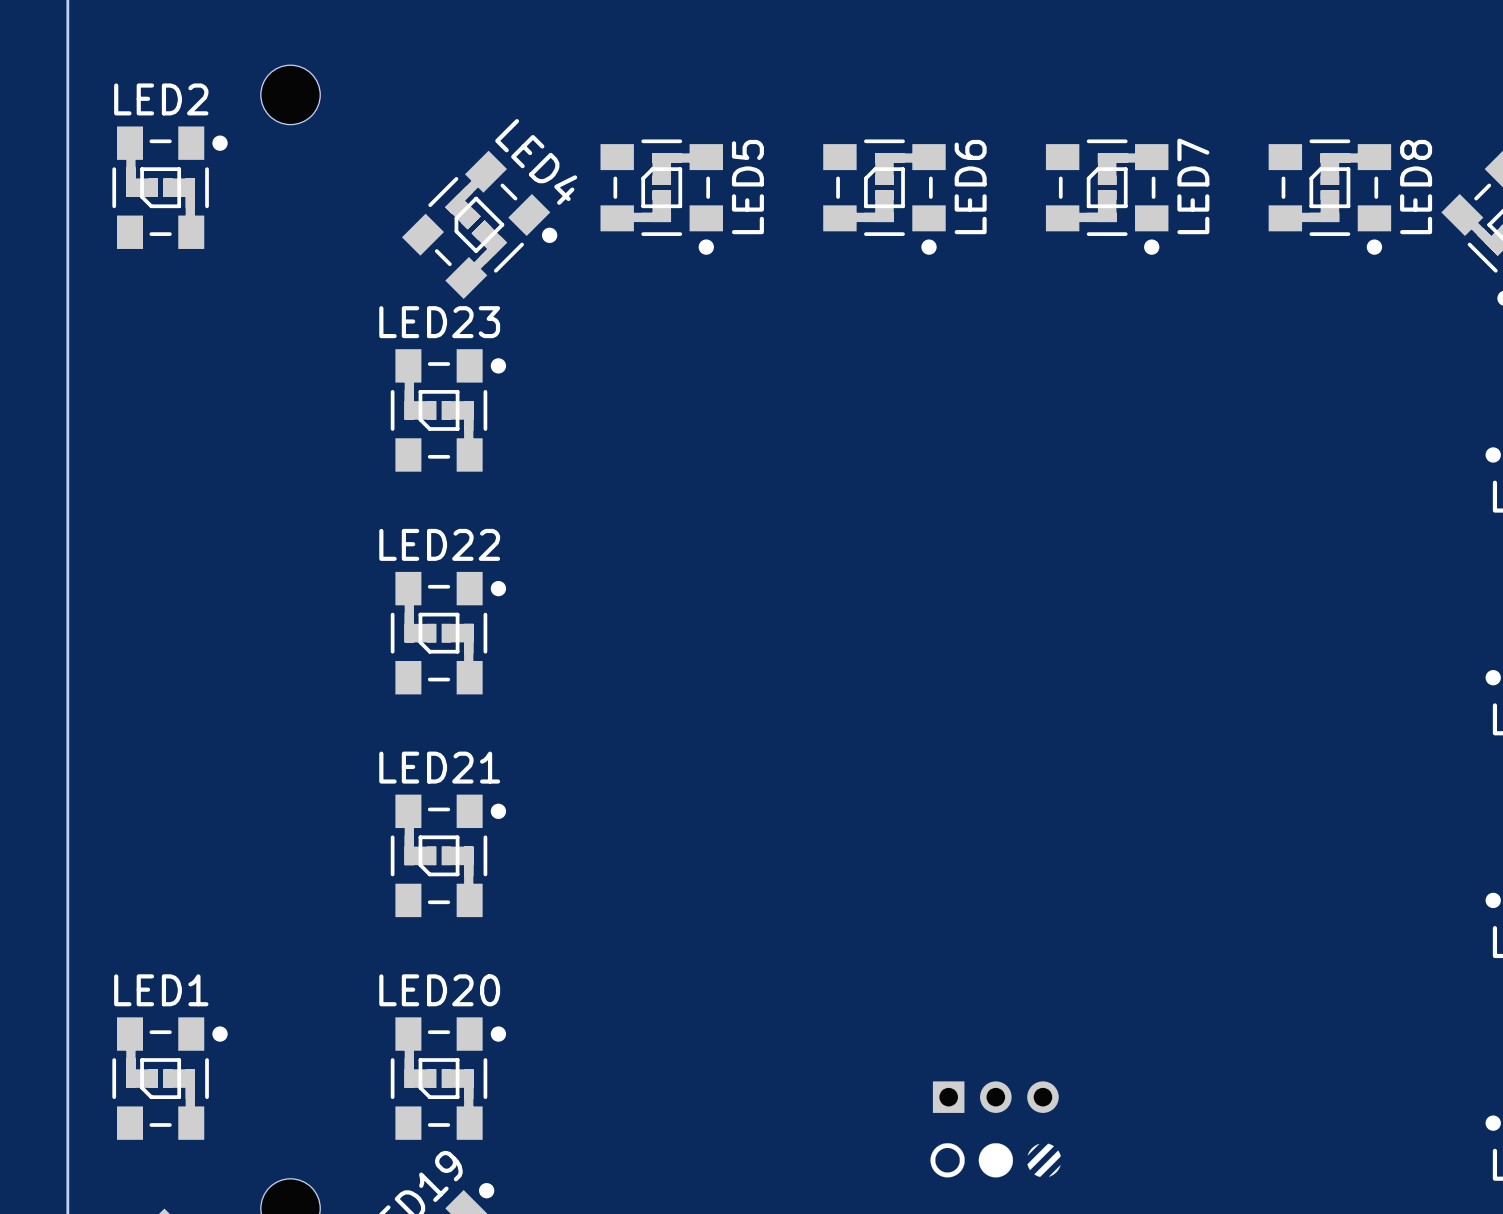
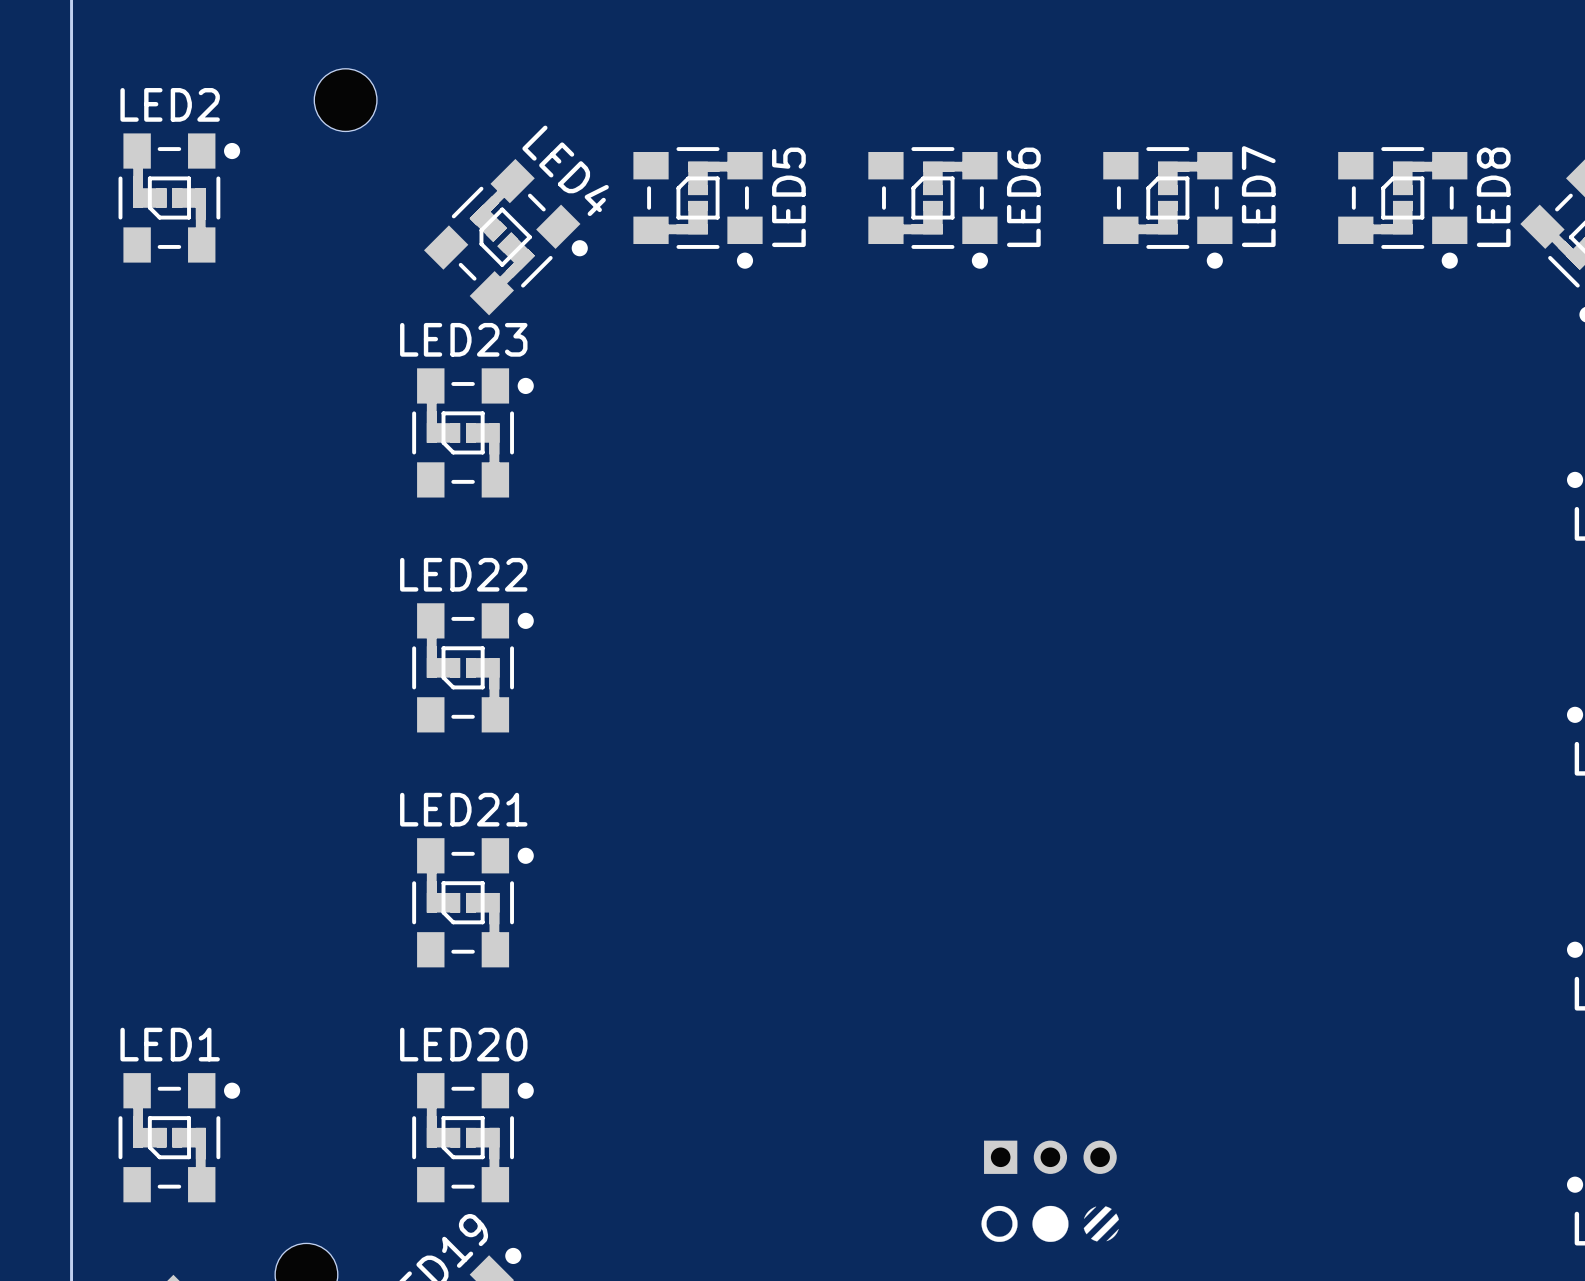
part position: (290, 94) -> (345, 100)

